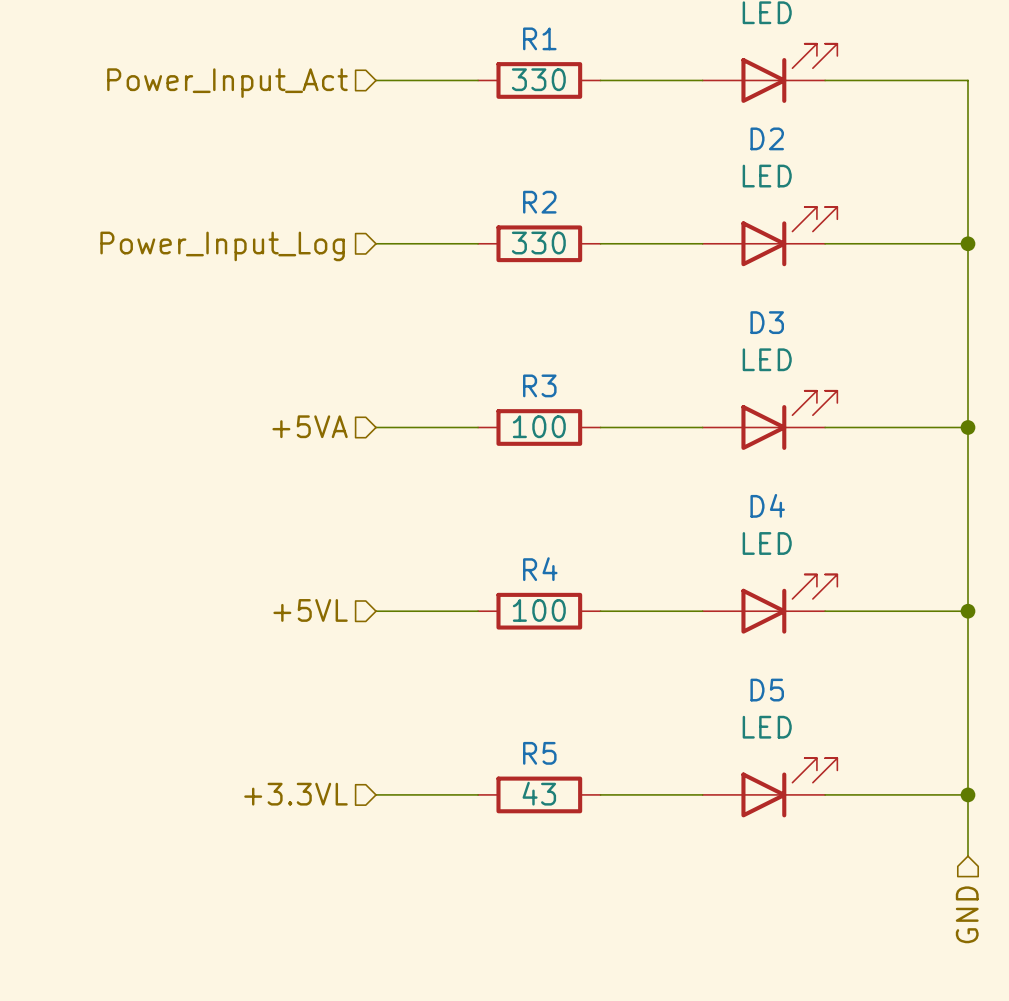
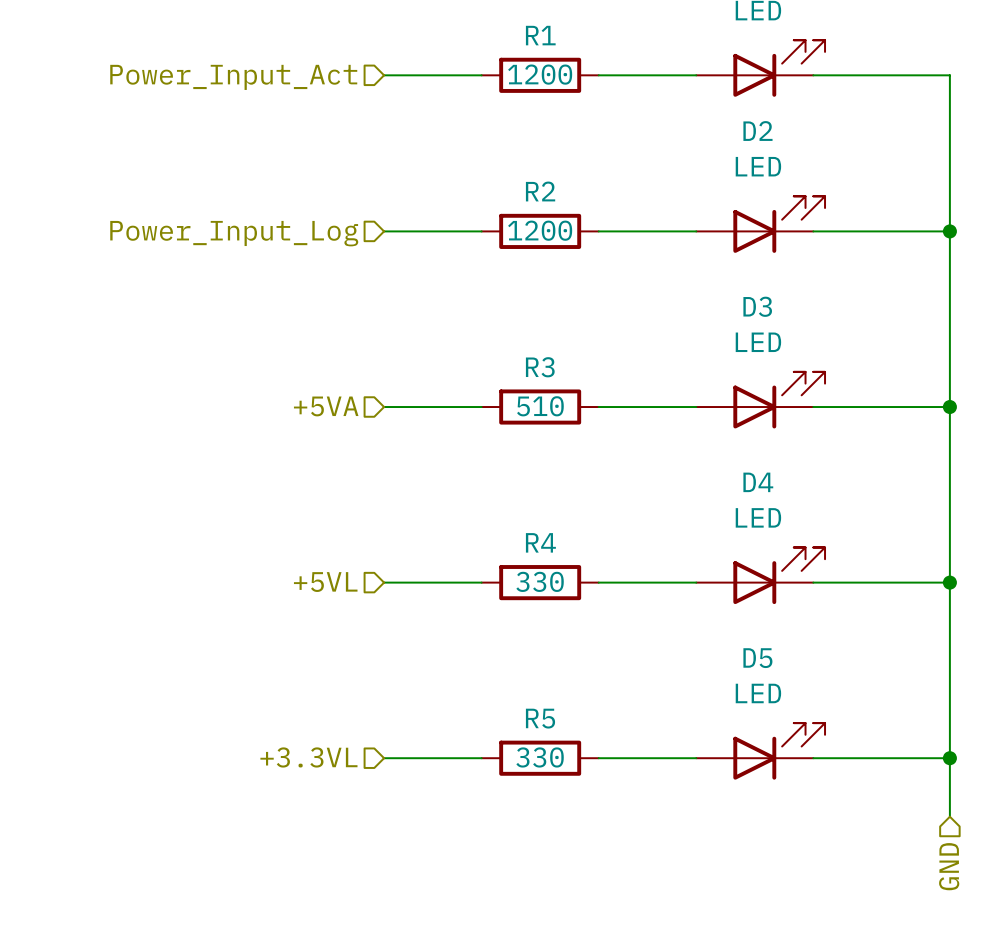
R1 value: 330 (538, 79) -> 1200 (540, 74)
R2 value: 330 (538, 243) -> 1200 (540, 230)
R3 value: 100 (539, 426) -> 510 (540, 406)
R4 value: 100 (539, 610) -> 330 (540, 581)
R5 value: 43 (539, 793) -> 330 (540, 757)

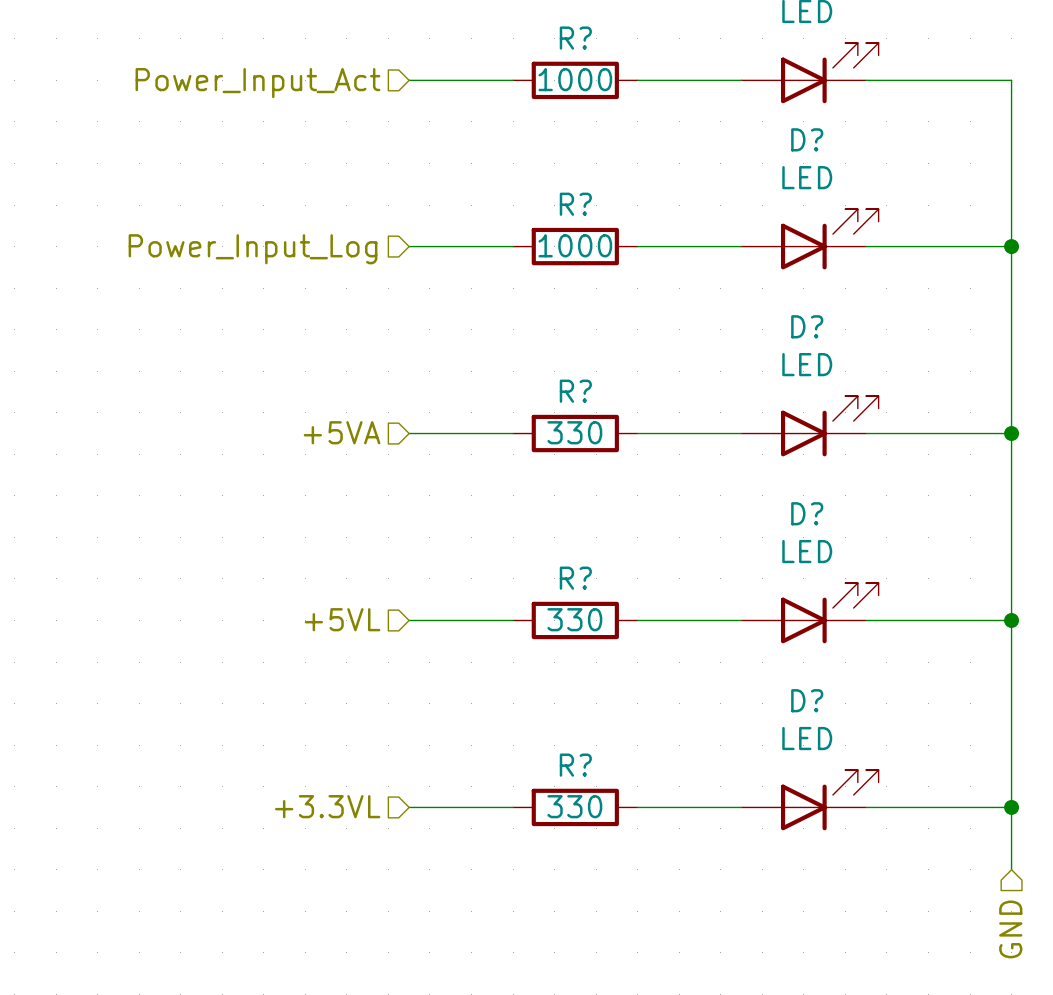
R1 name: R1 (540, 35) -> R? (575, 38)
R1 value: 1200 (540, 74) -> 1000 (575, 79)
D2 name: D2 (757, 131) -> D? (807, 139)
R2 name: R2 (540, 191) -> R? (575, 204)
R2 value: 1200 (540, 230) -> 1000 (575, 245)
D3 name: D3 (757, 306) -> D? (807, 326)
R3 name: R3 (540, 367) -> R? (575, 391)
R3 value: 510 (540, 406) -> 330 (574, 432)
D4 name: D4 (758, 482) -> D? (807, 513)
R4 name: R4 (540, 542) -> R? (575, 578)
D5 name: D5 (757, 658) -> D? (807, 700)
R5 name: R5 (540, 718) -> R? (575, 765)

